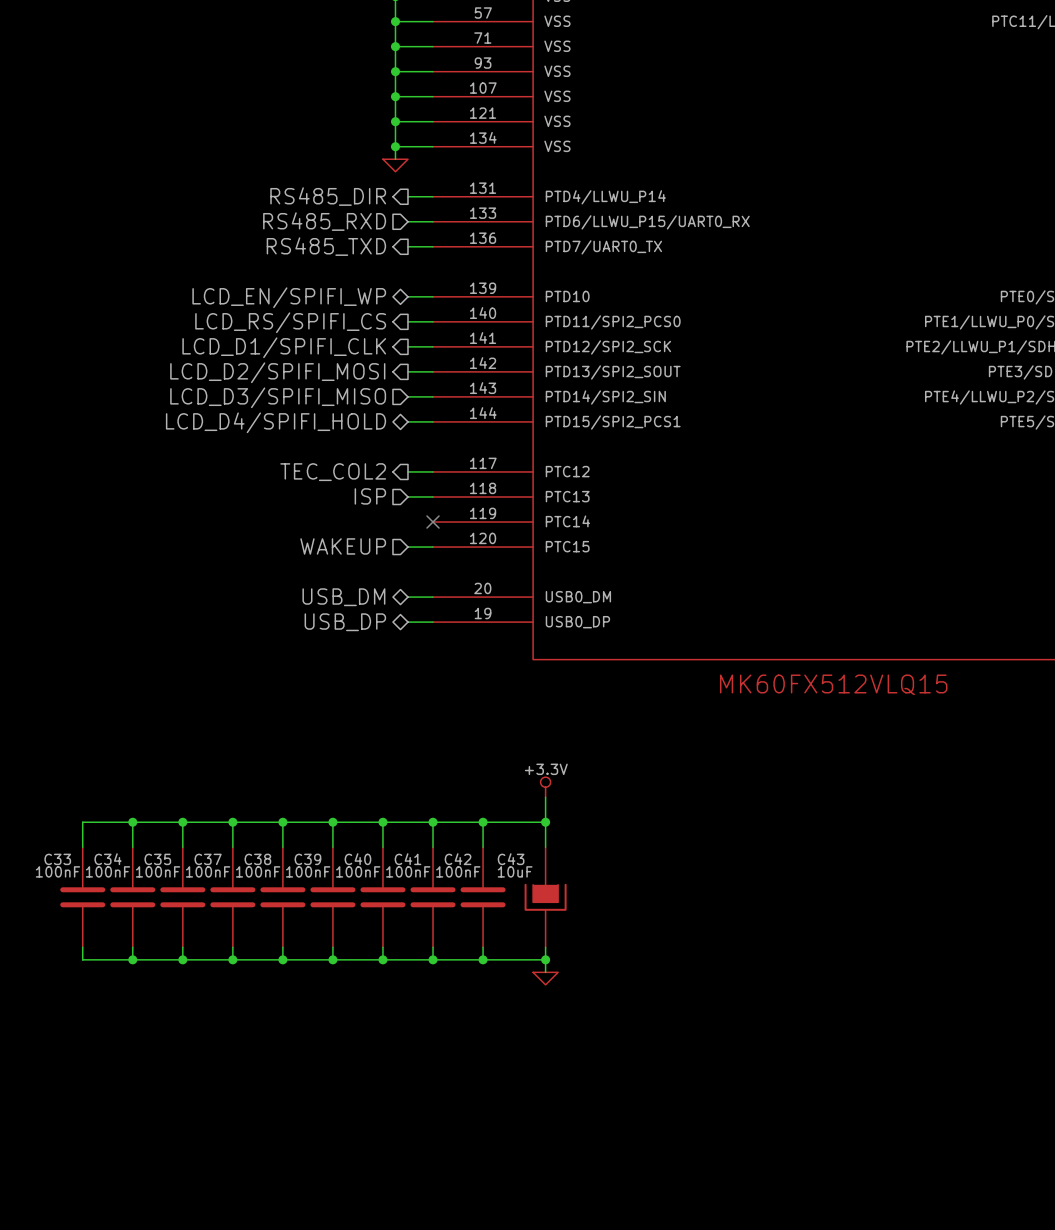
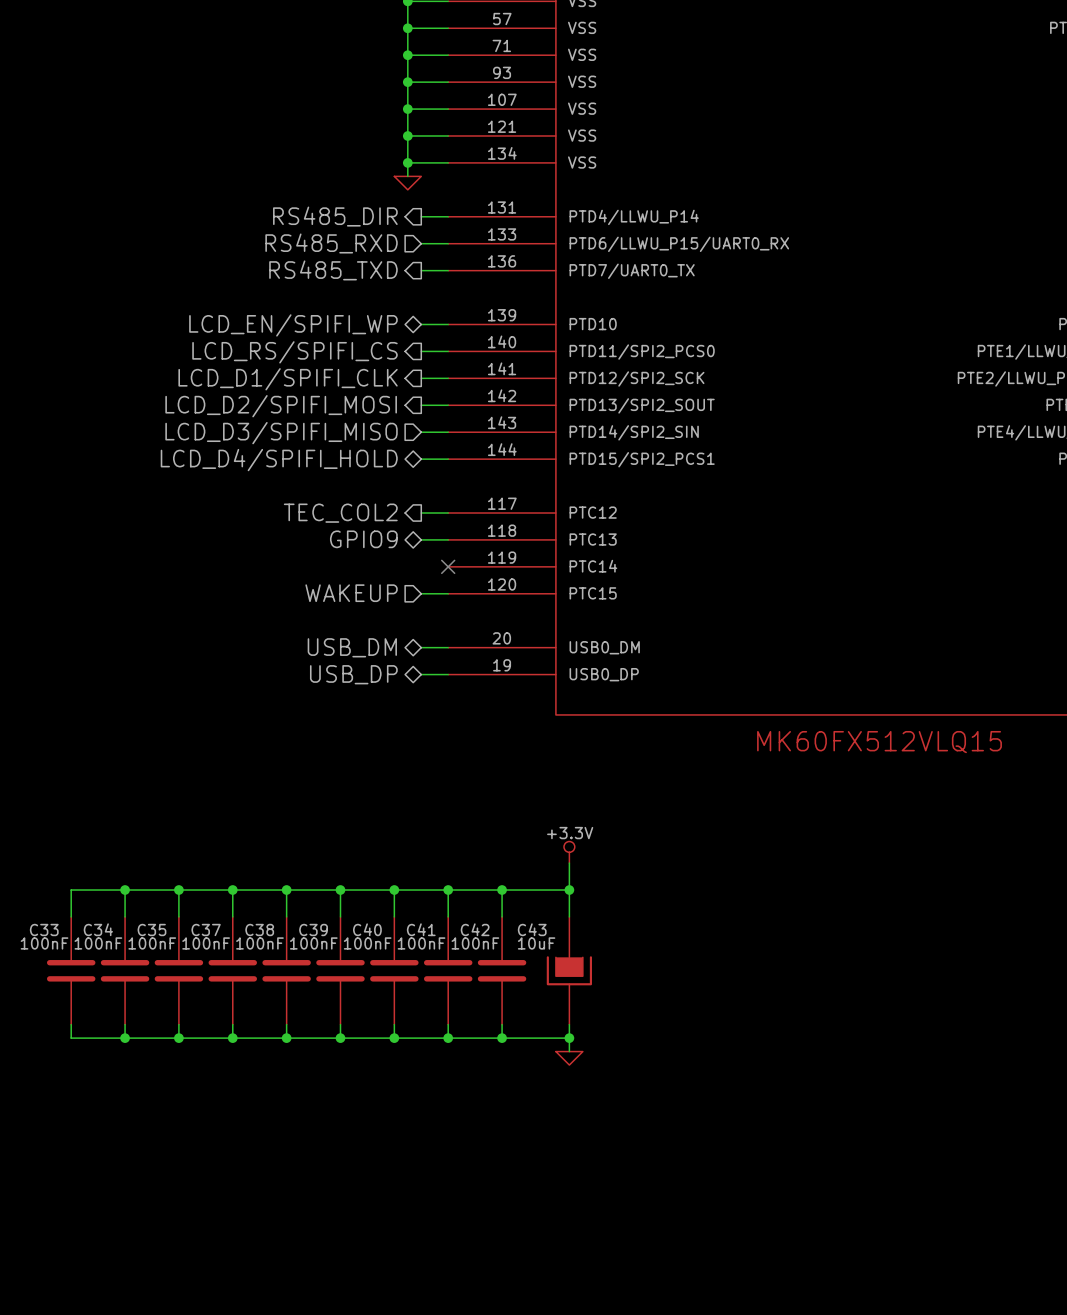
hierarchical label shape: input (370, 496) -> bidirectional (363, 539)
hierarchical label: ISP (370, 496) -> GPIO9 (363, 539)

